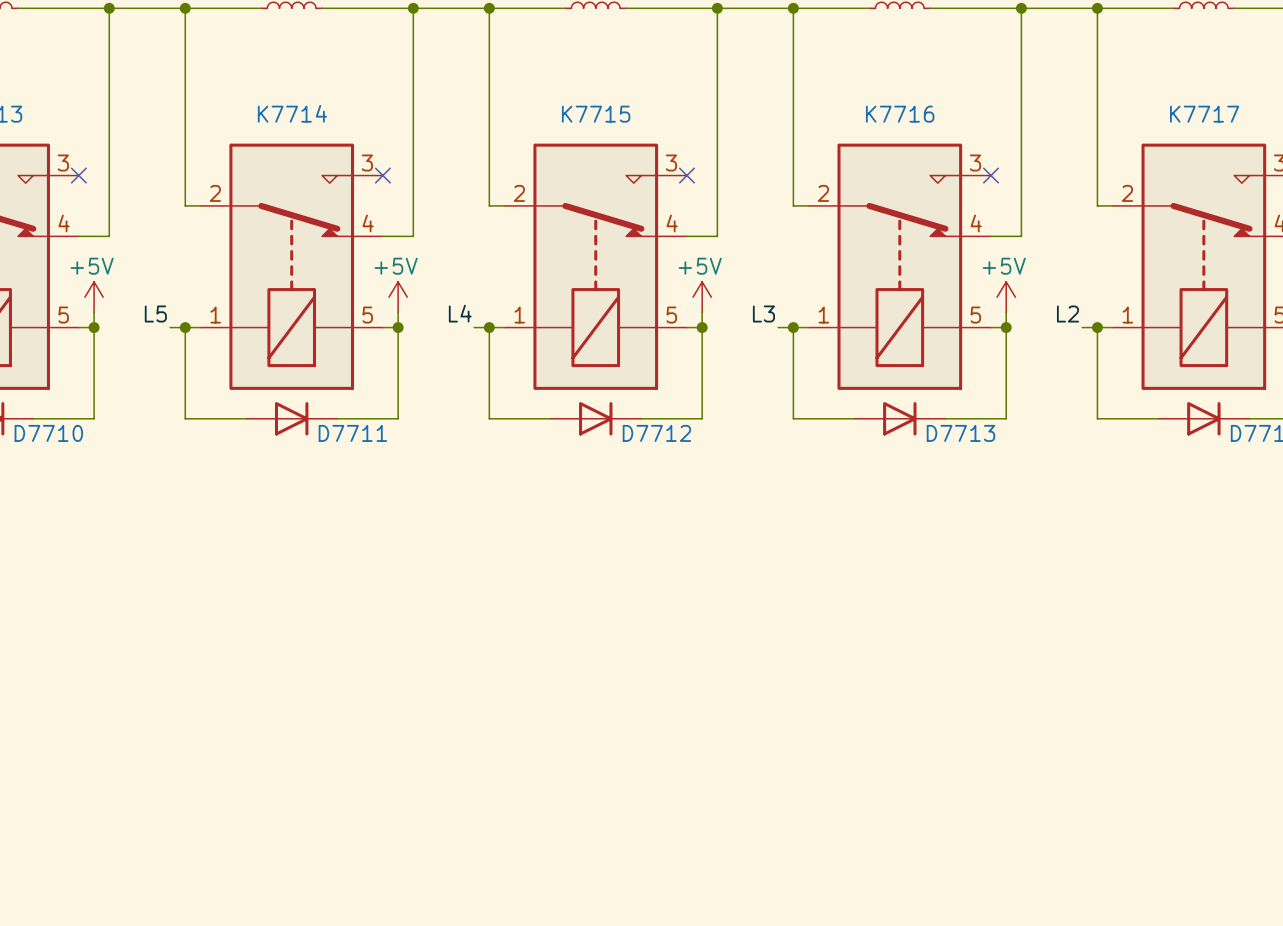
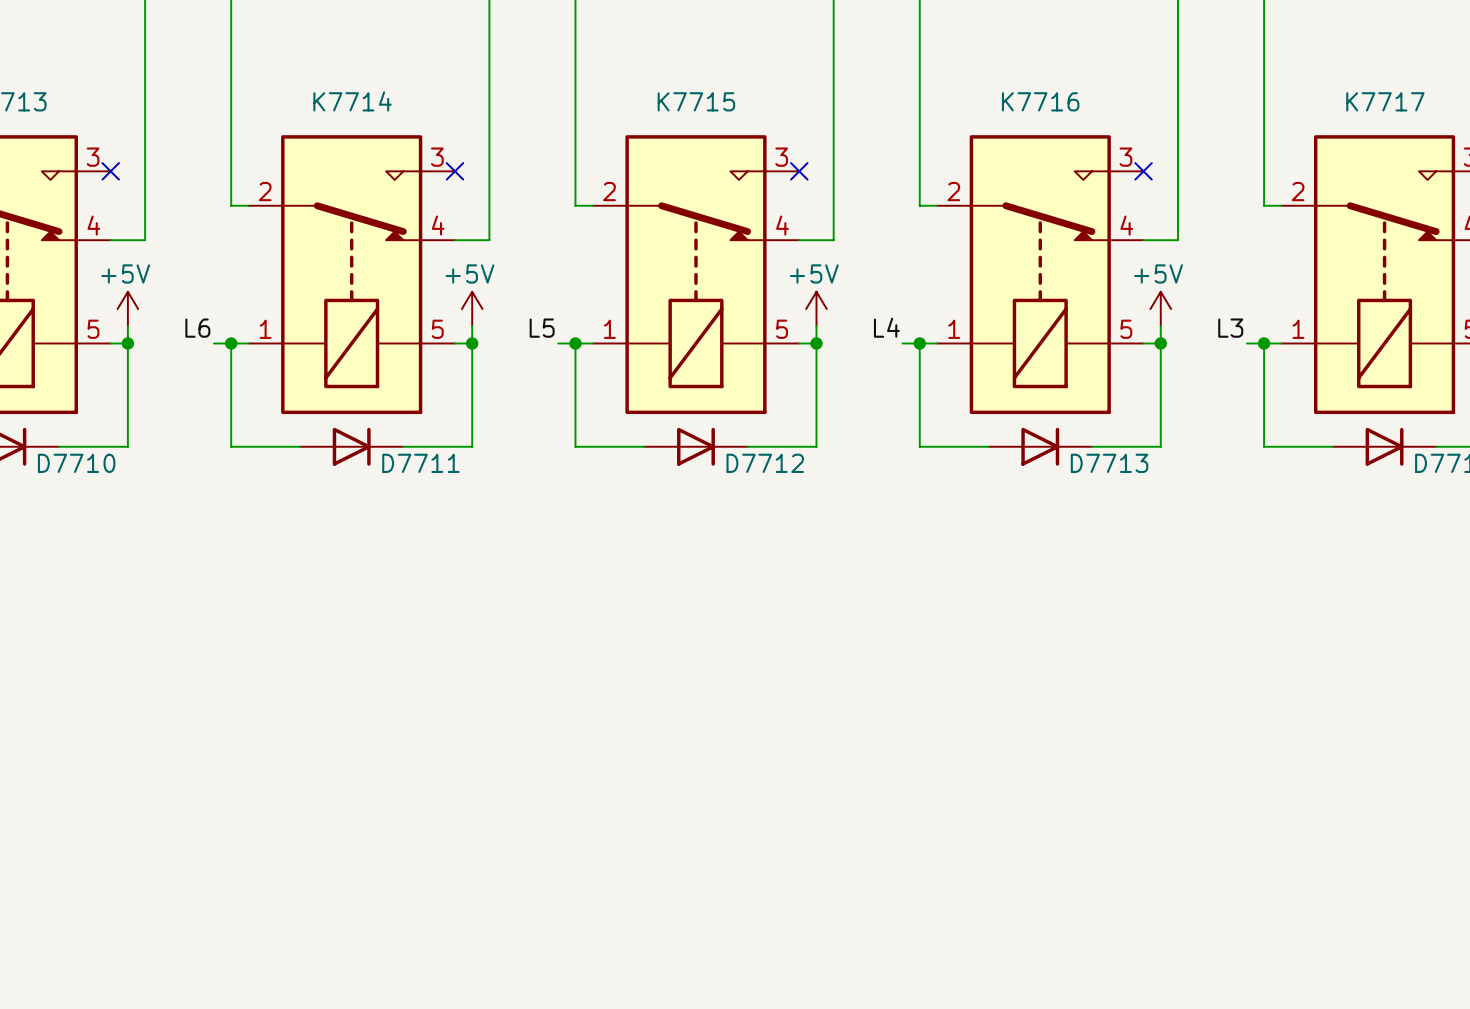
label: L4 (460, 313) -> L5 (542, 328)
label: L5 (155, 314) -> L6 (197, 328)
label: L3 (763, 314) -> L4 (886, 327)
label: L2 (1068, 314) -> L3 (1230, 328)

